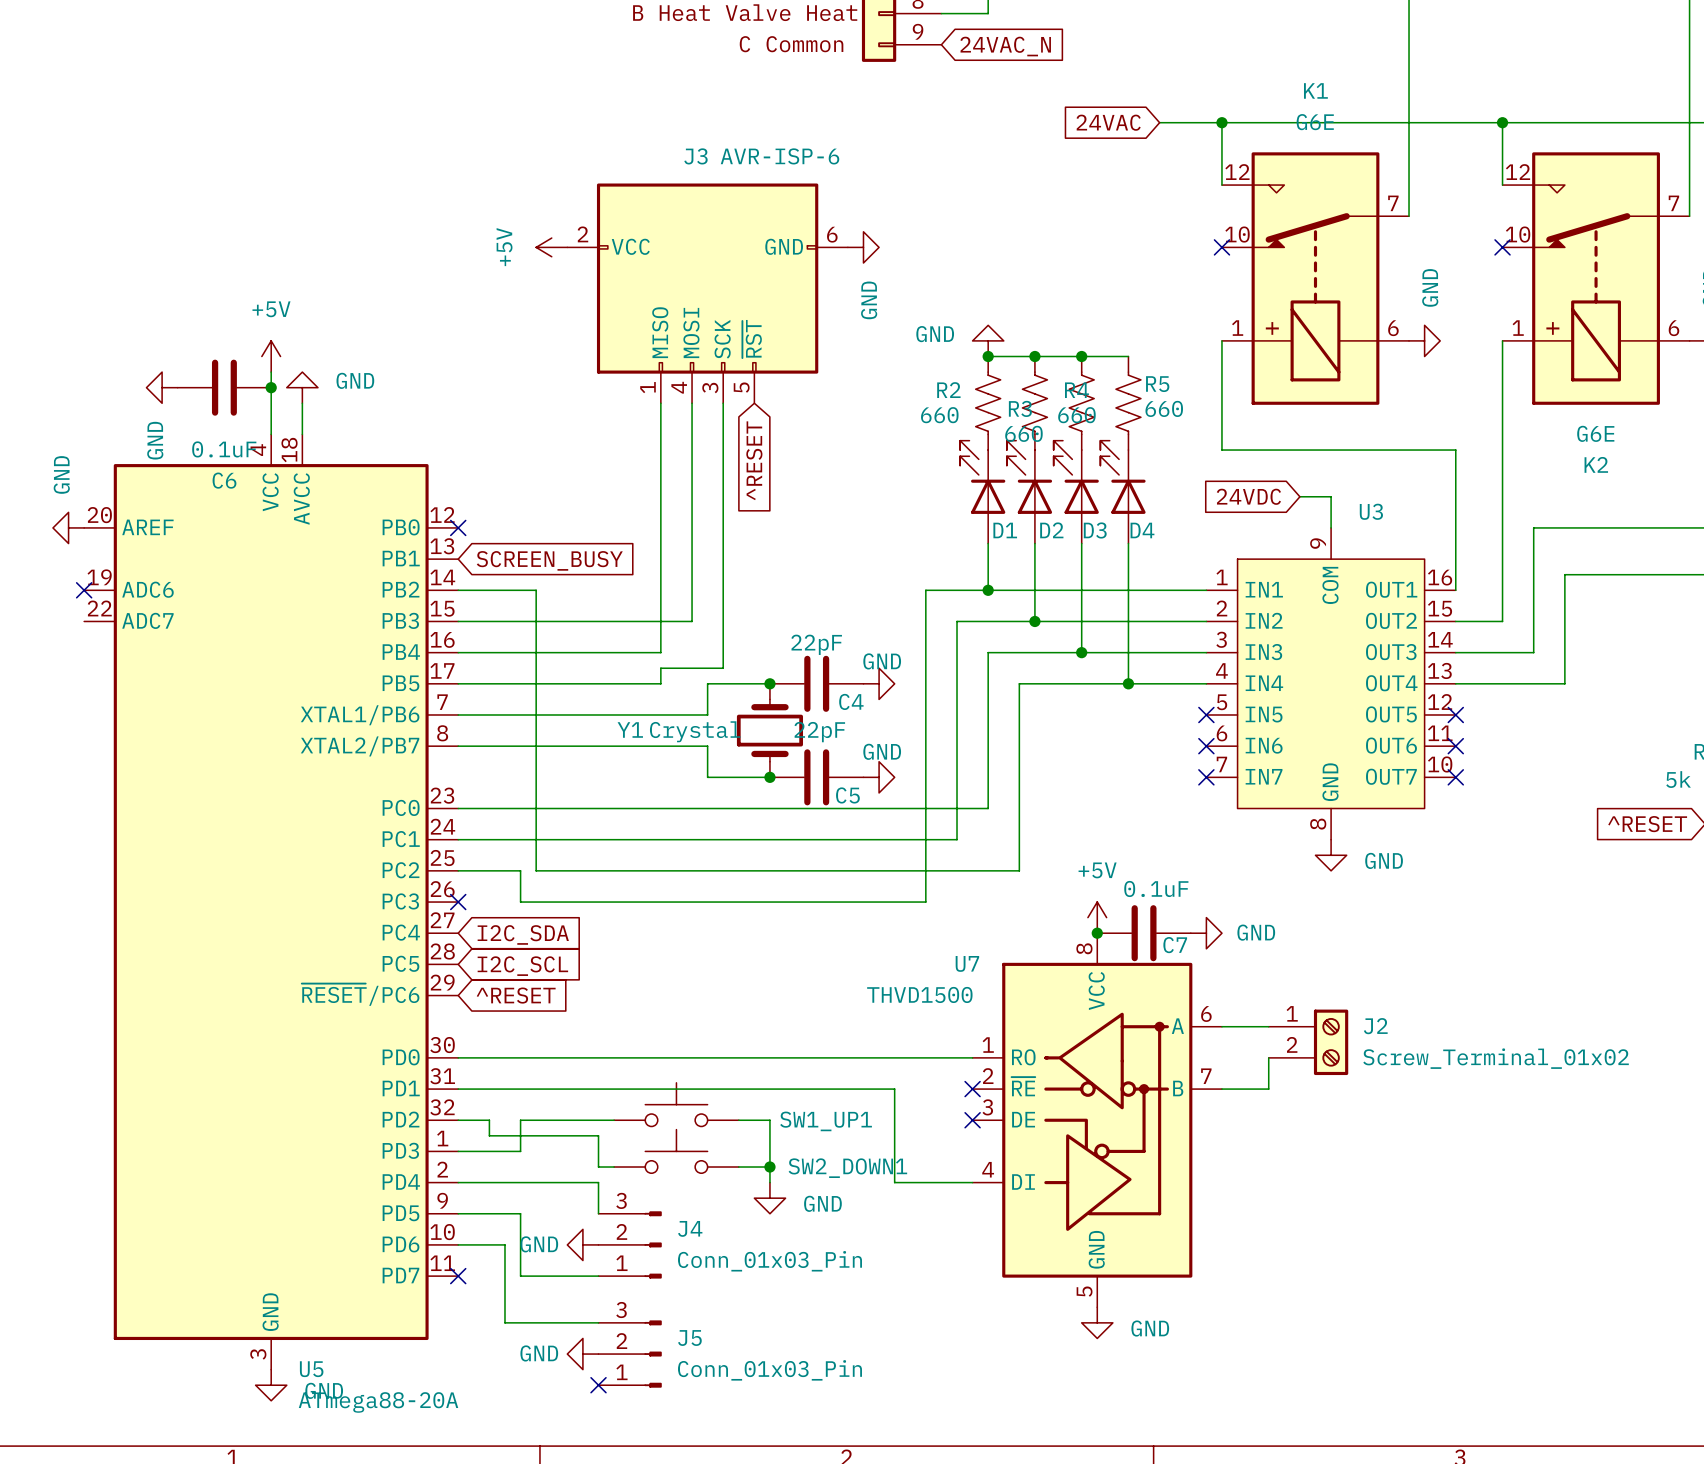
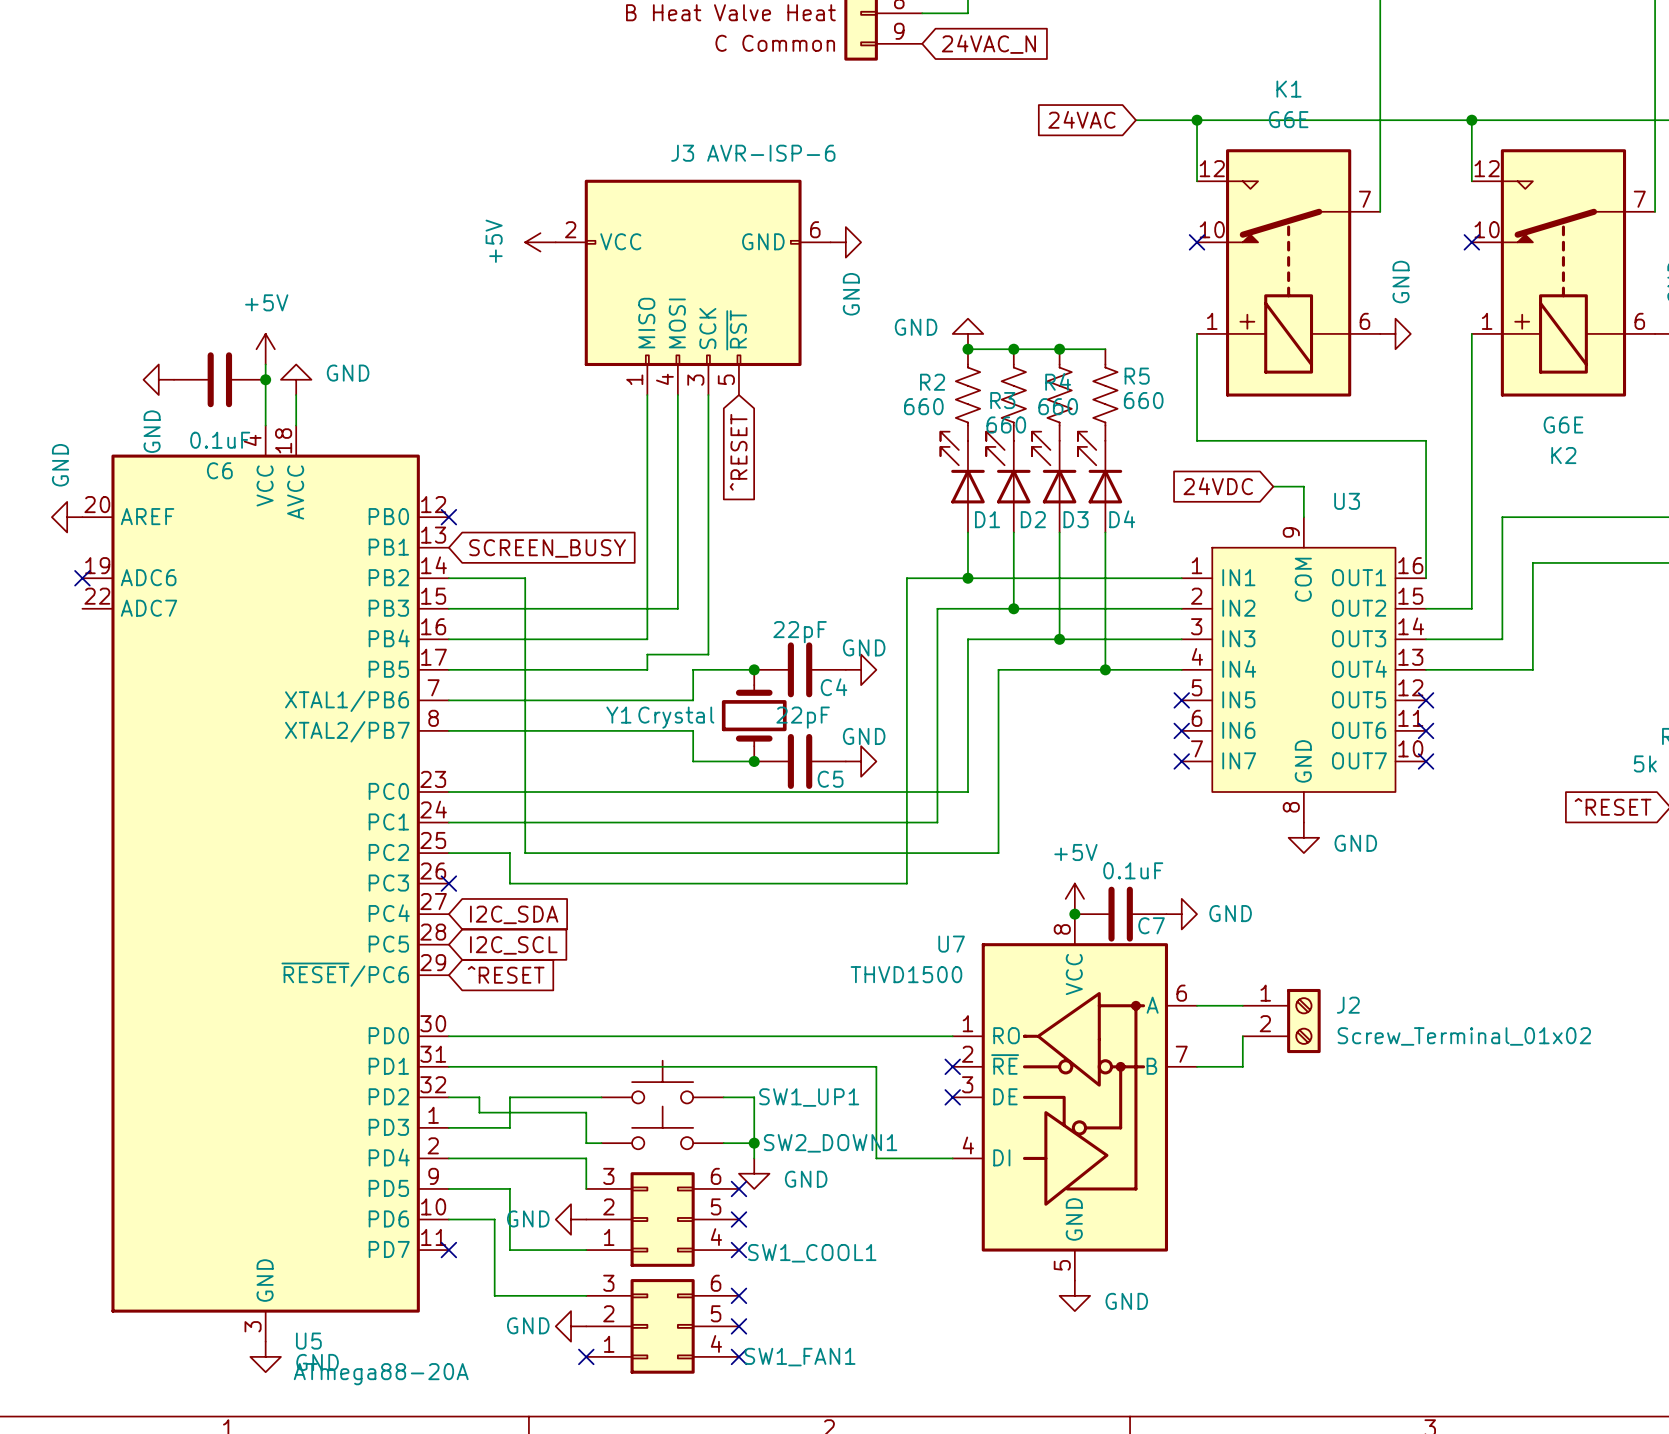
no-connect mark: none -> (738, 1188)
J4: Conn_01x03_Pin (630, 1244) -> none
SW1_COOL1: none -> (662, 1219)
no-connect mark: none -> (738, 1219)
no-connect mark: none -> (738, 1250)
no-connect mark: none -> (738, 1295)
J5: Conn_01x03_Pin (630, 1354) -> none
SW1_FAN1: none -> (662, 1326)
no-connect mark: none -> (738, 1326)
no-connect mark: none -> (738, 1356)

